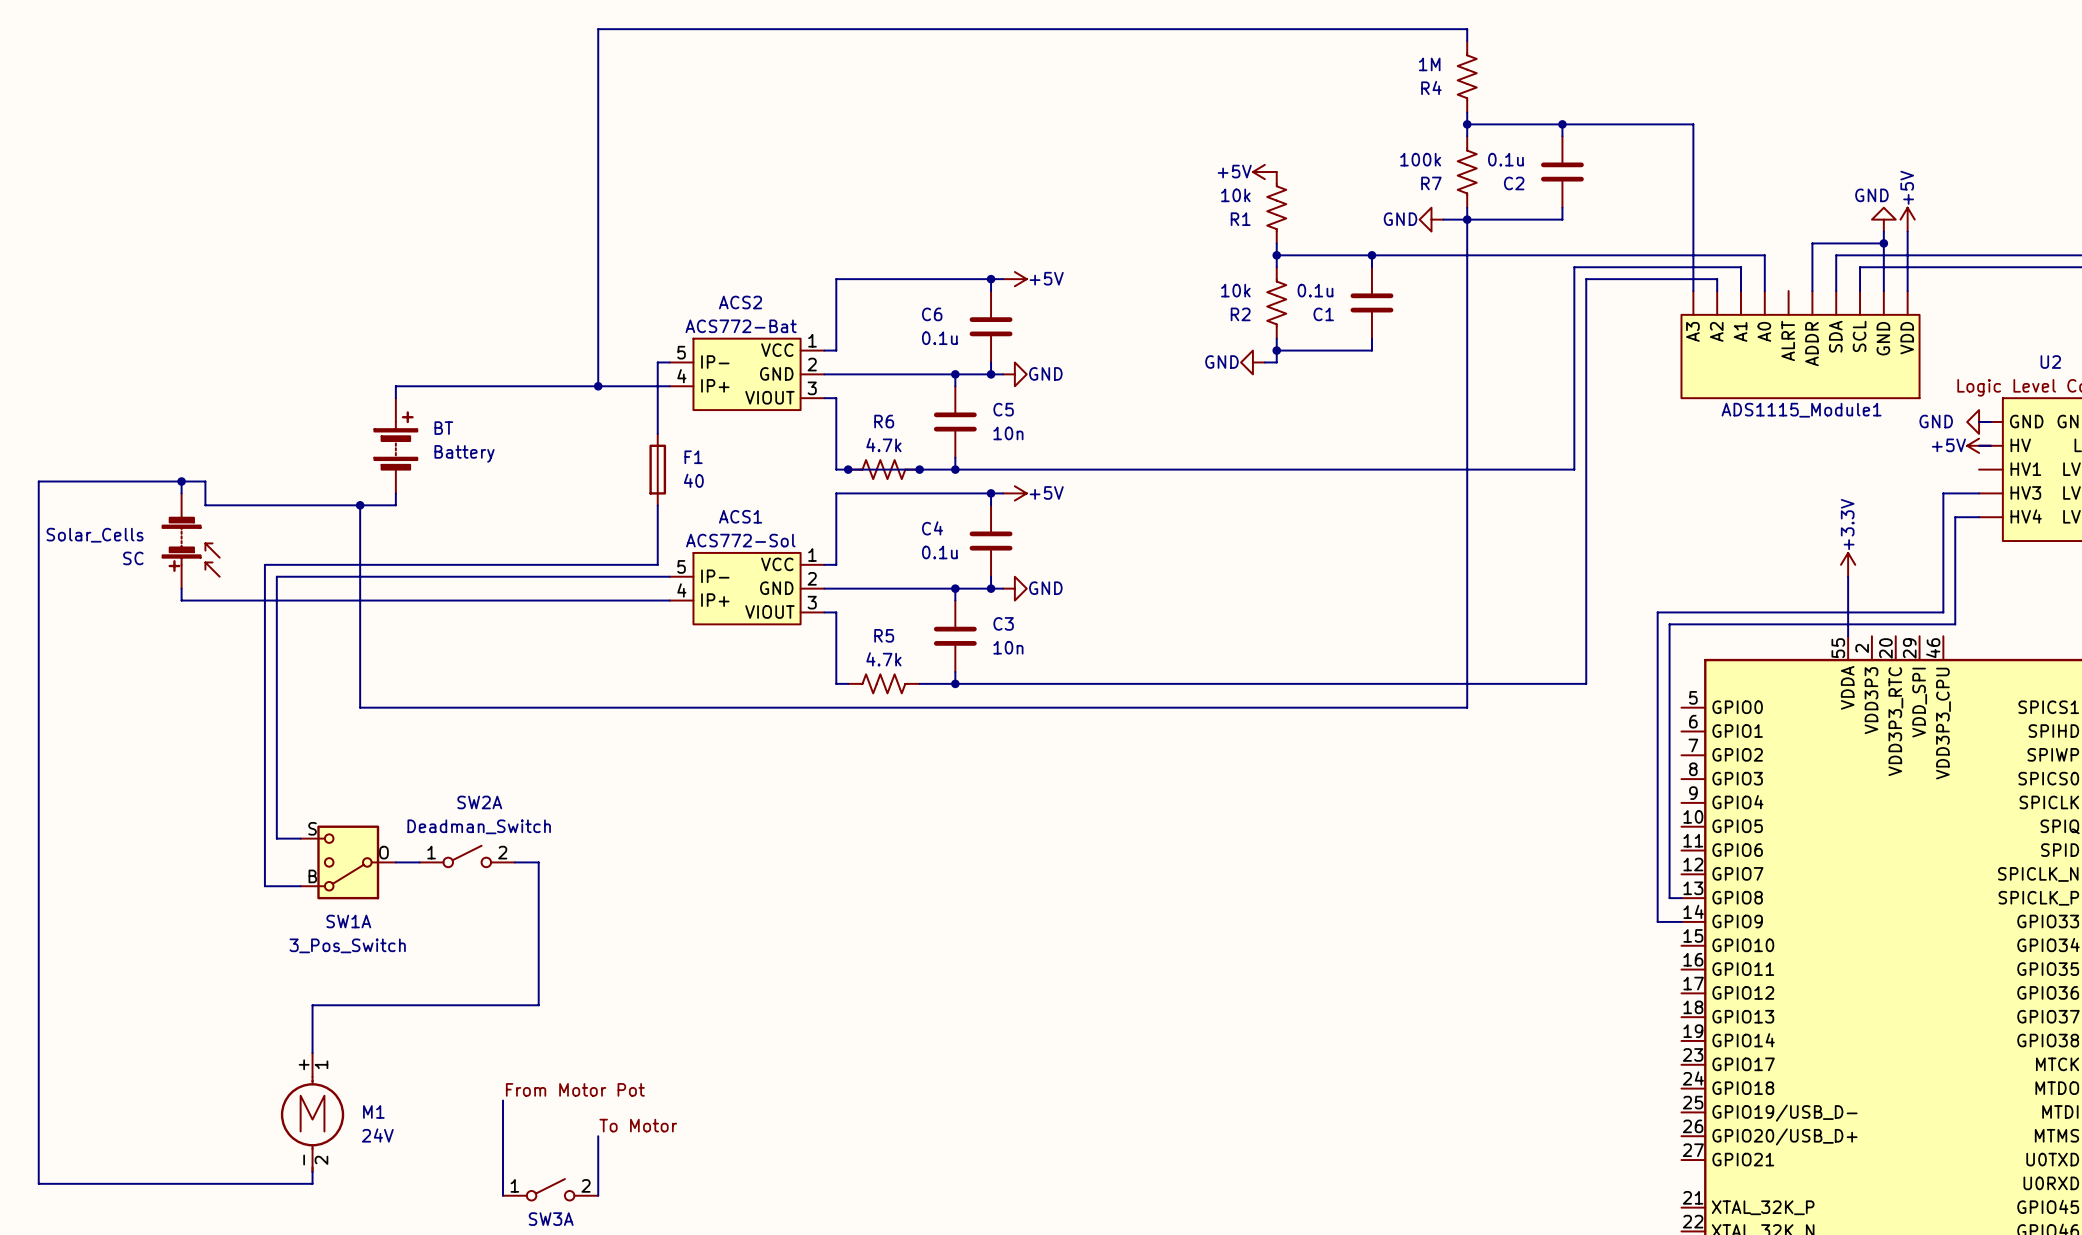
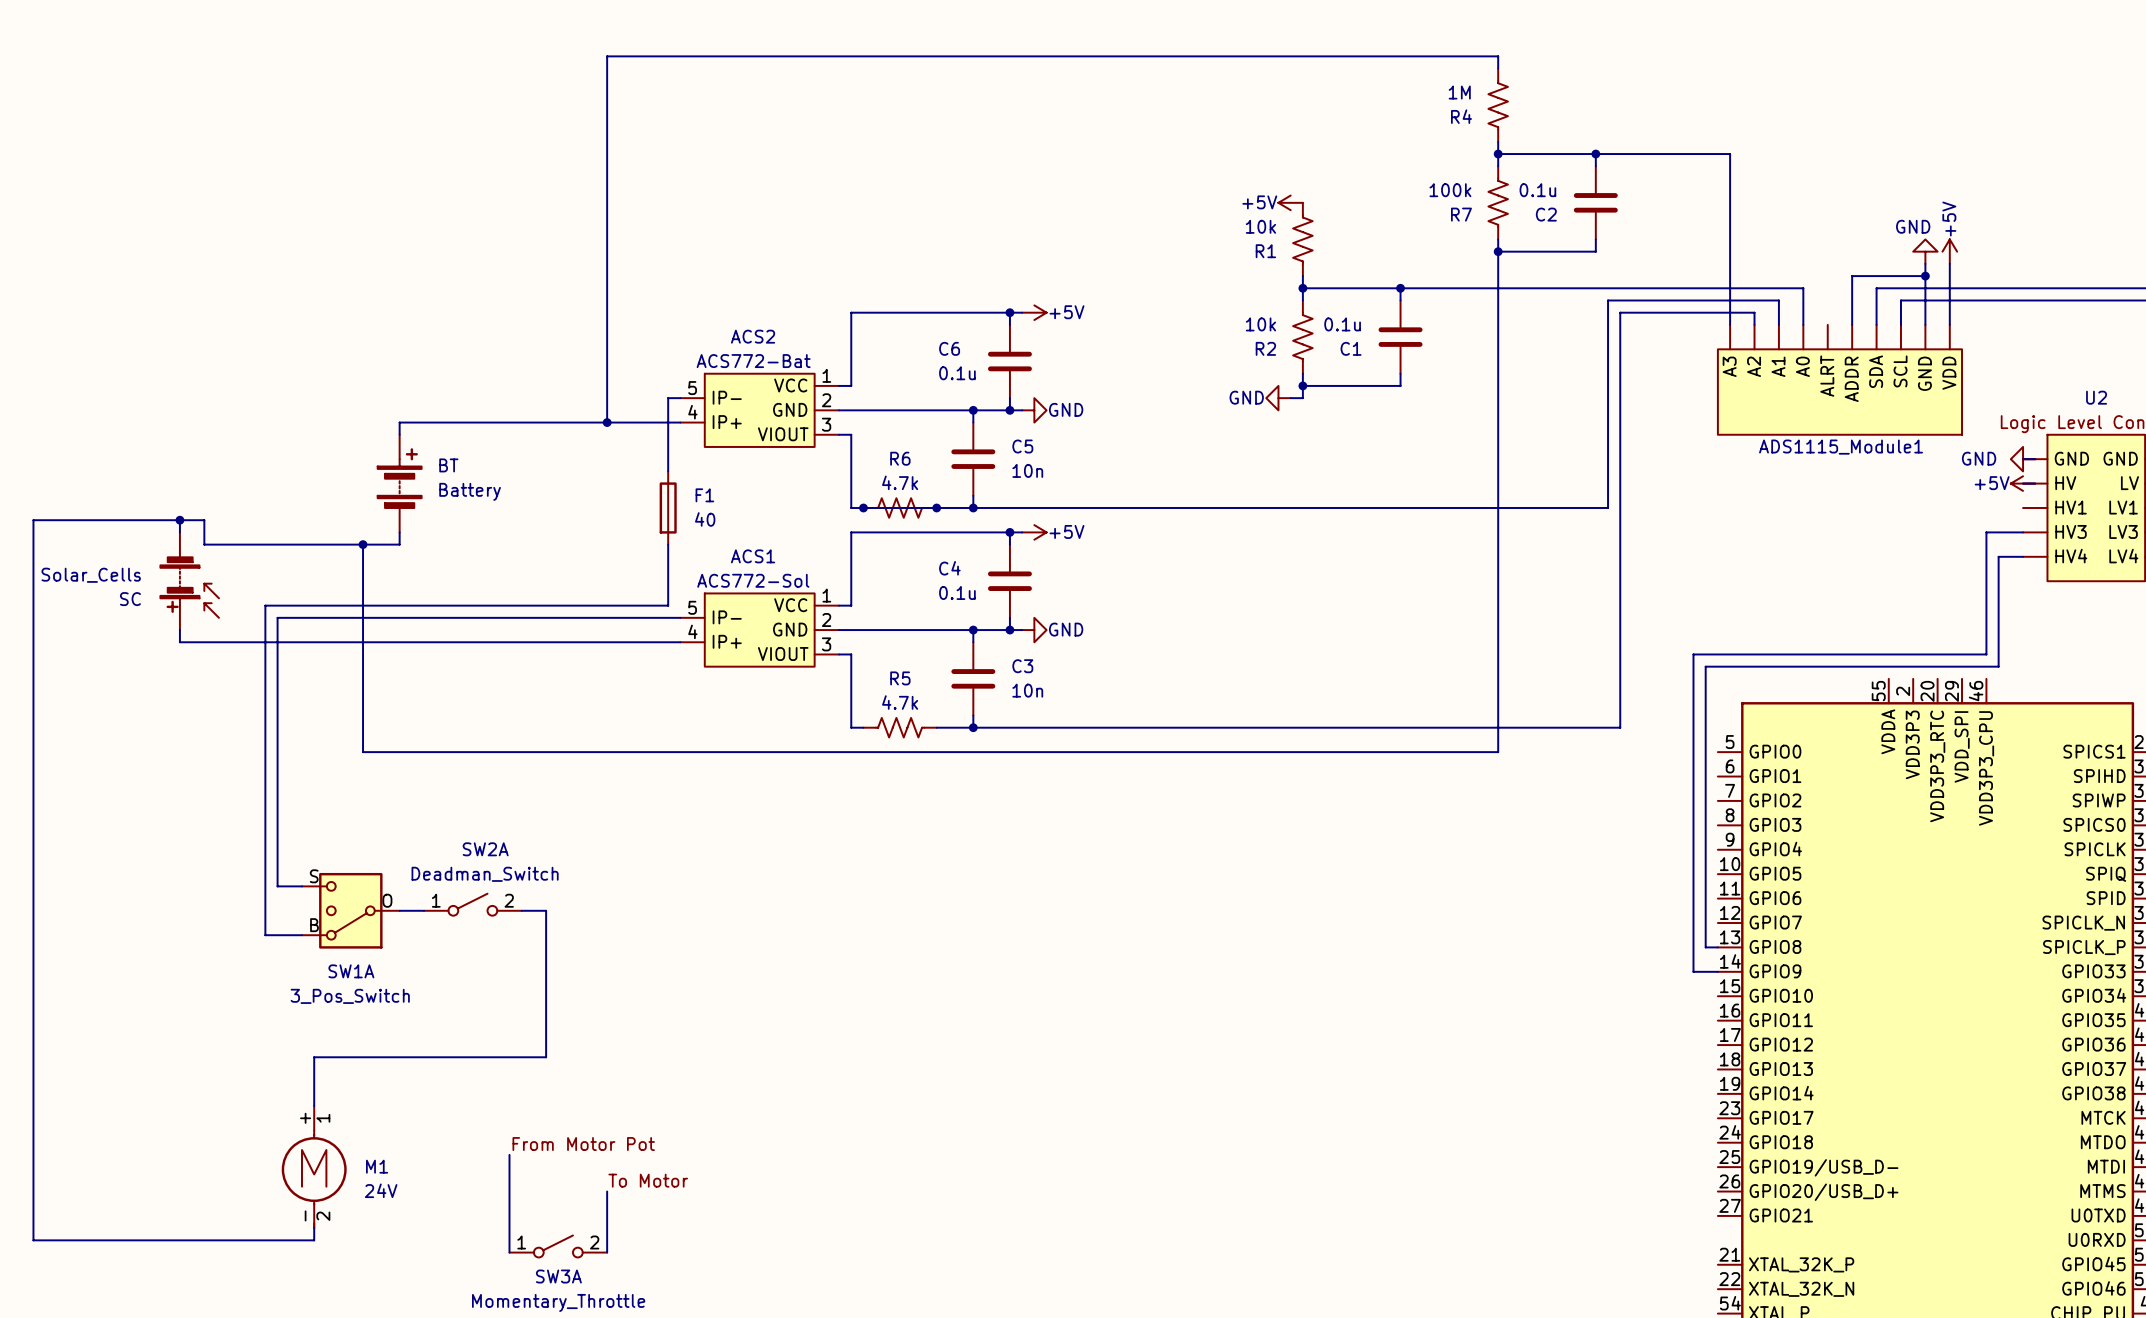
power symbol: GND (1431, 219) -> none
wire: (1443, 219) (1467, 219) -> none
power symbol: +3.3V (1848, 564) -> none
wire: (1848, 576) (1848, 636) -> none

